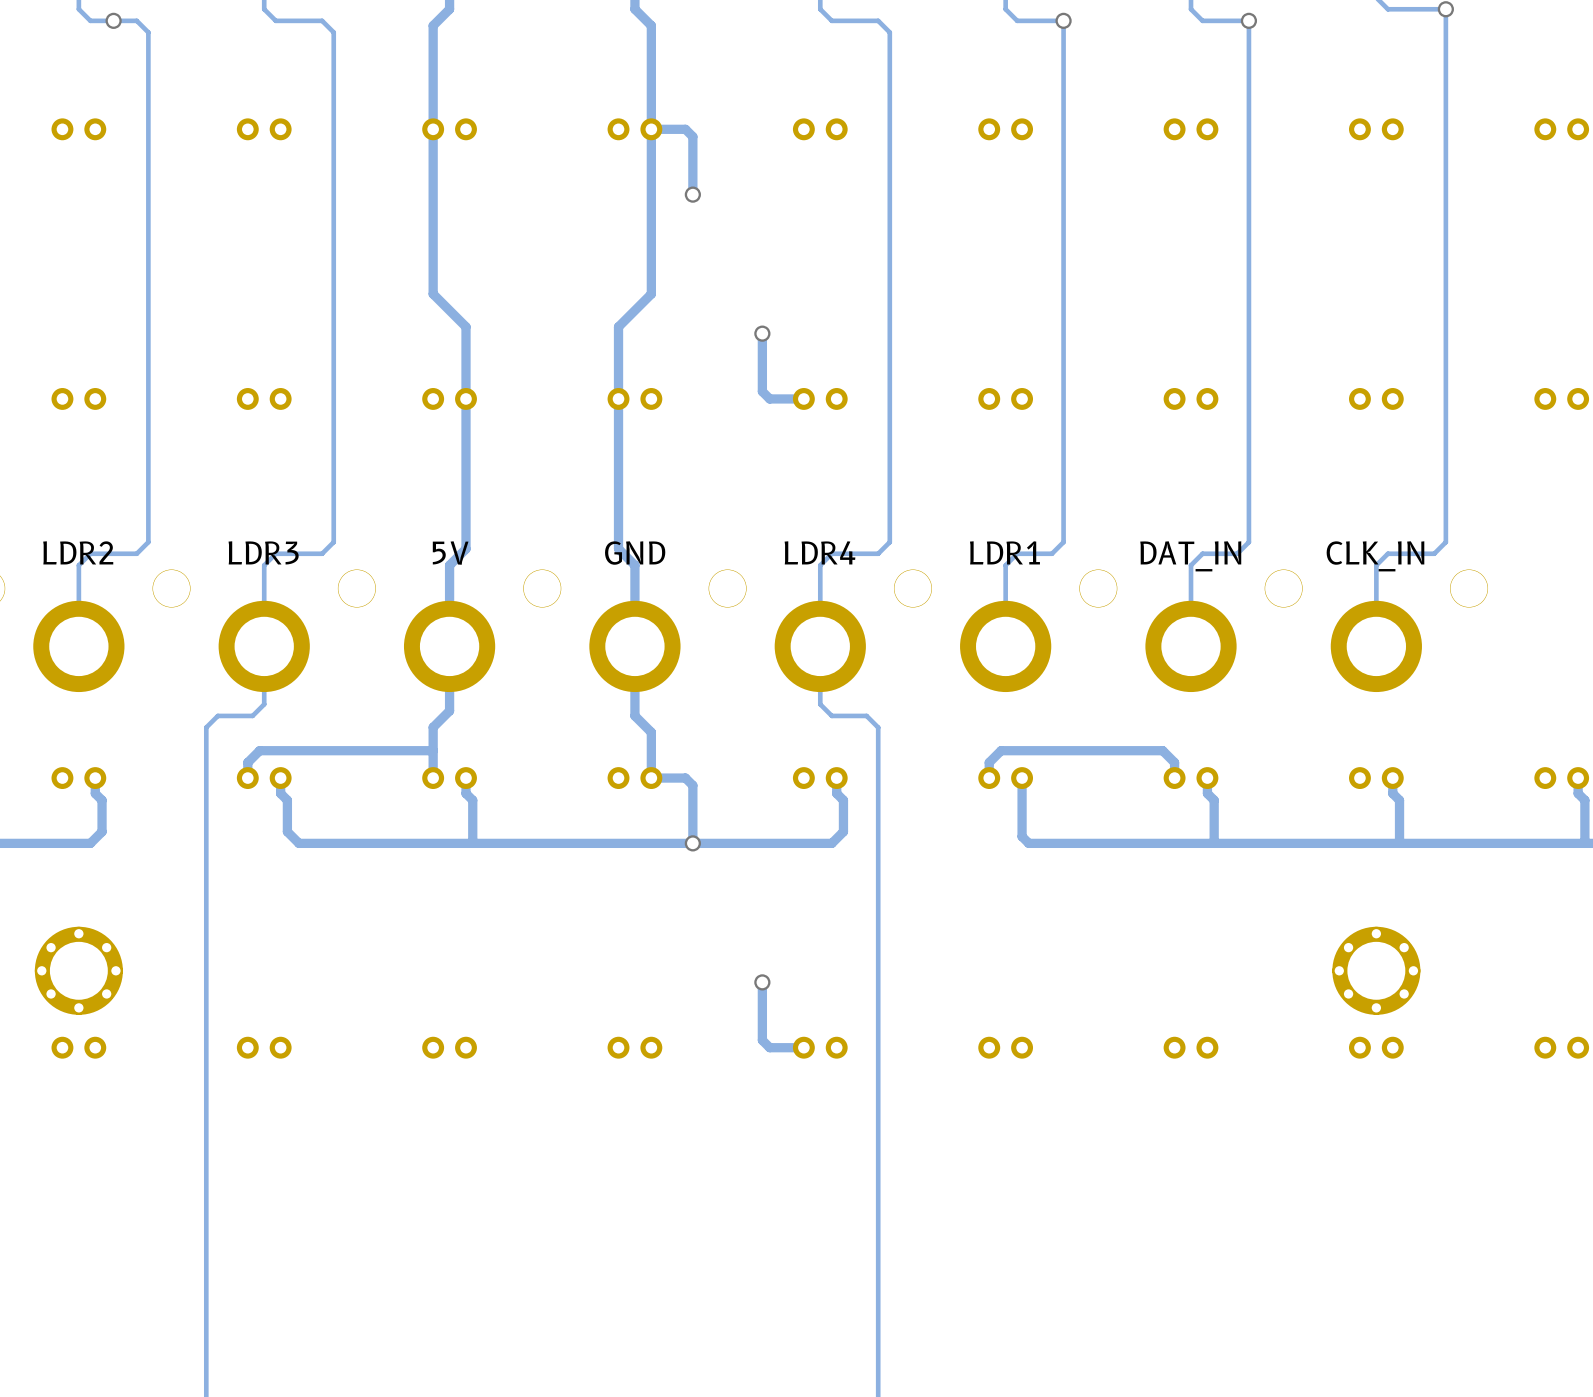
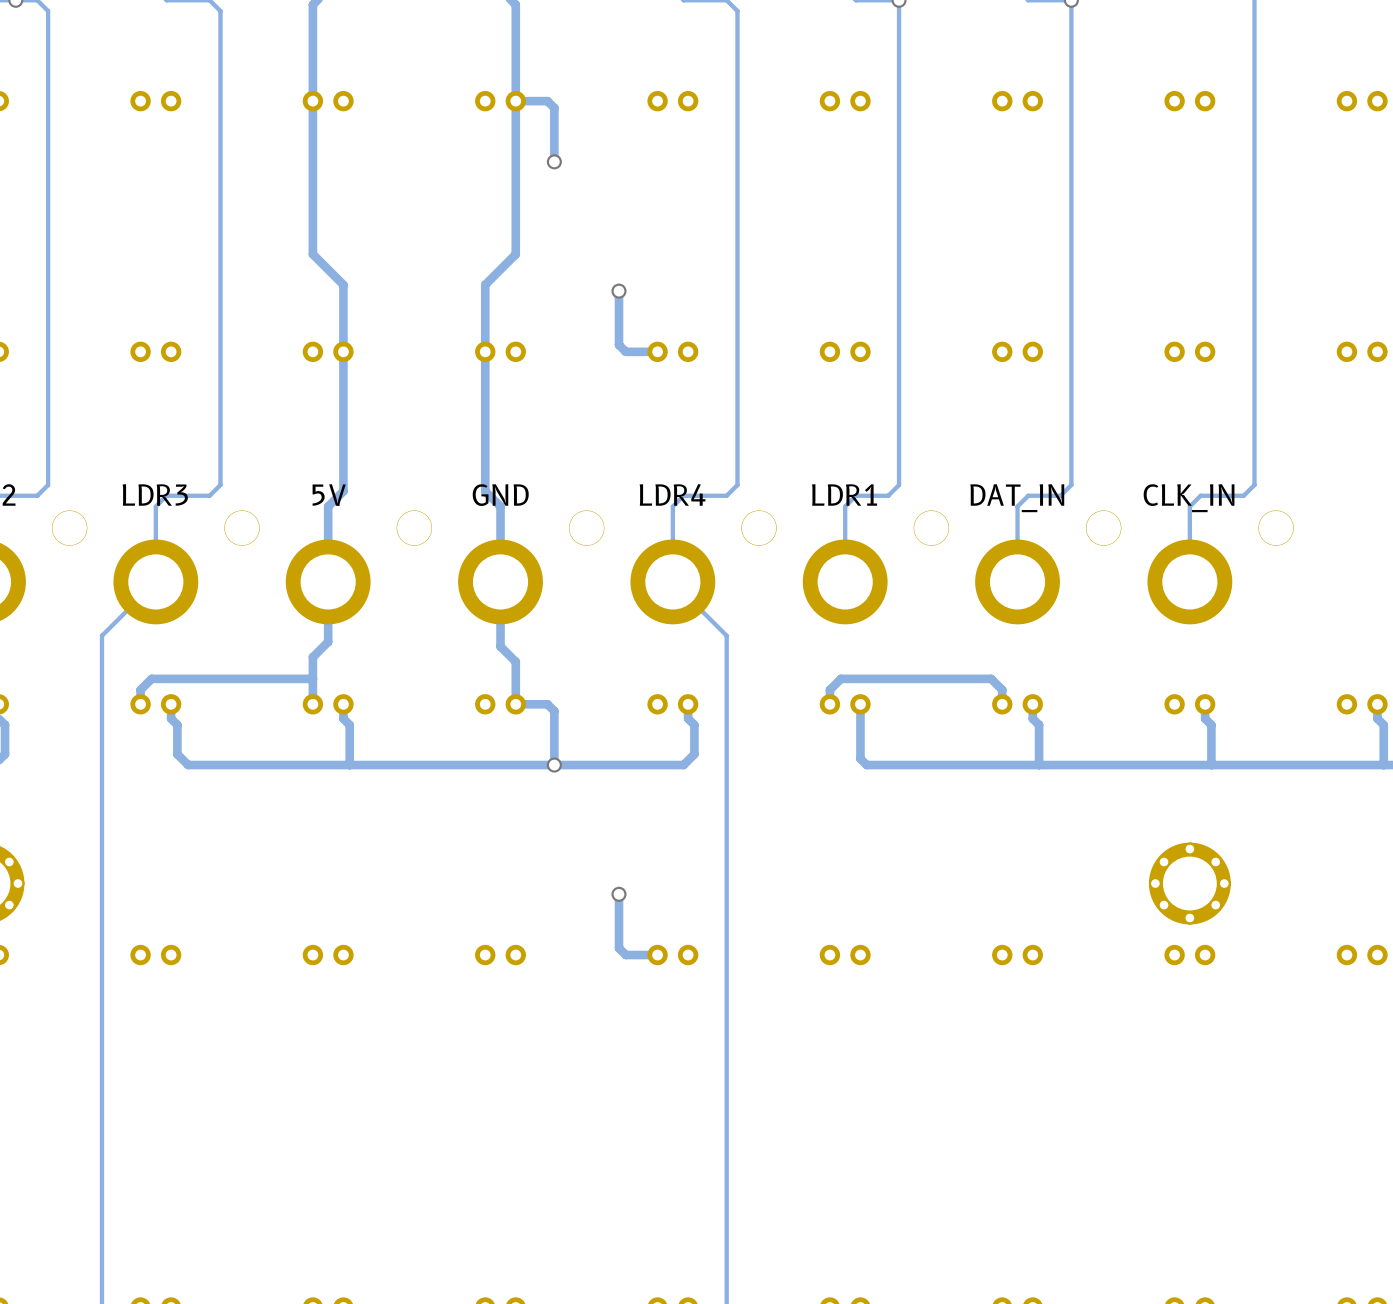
track: (264, 646) (264, 704) (252, 715) (217, 715) (206, 727) -> (155, 581) (101, 635) (101, 657)
track: (820, 646) (820, 704) (831, 715) (866, 715) (878, 727) -> (672, 581) (726, 635) (726, 657)

